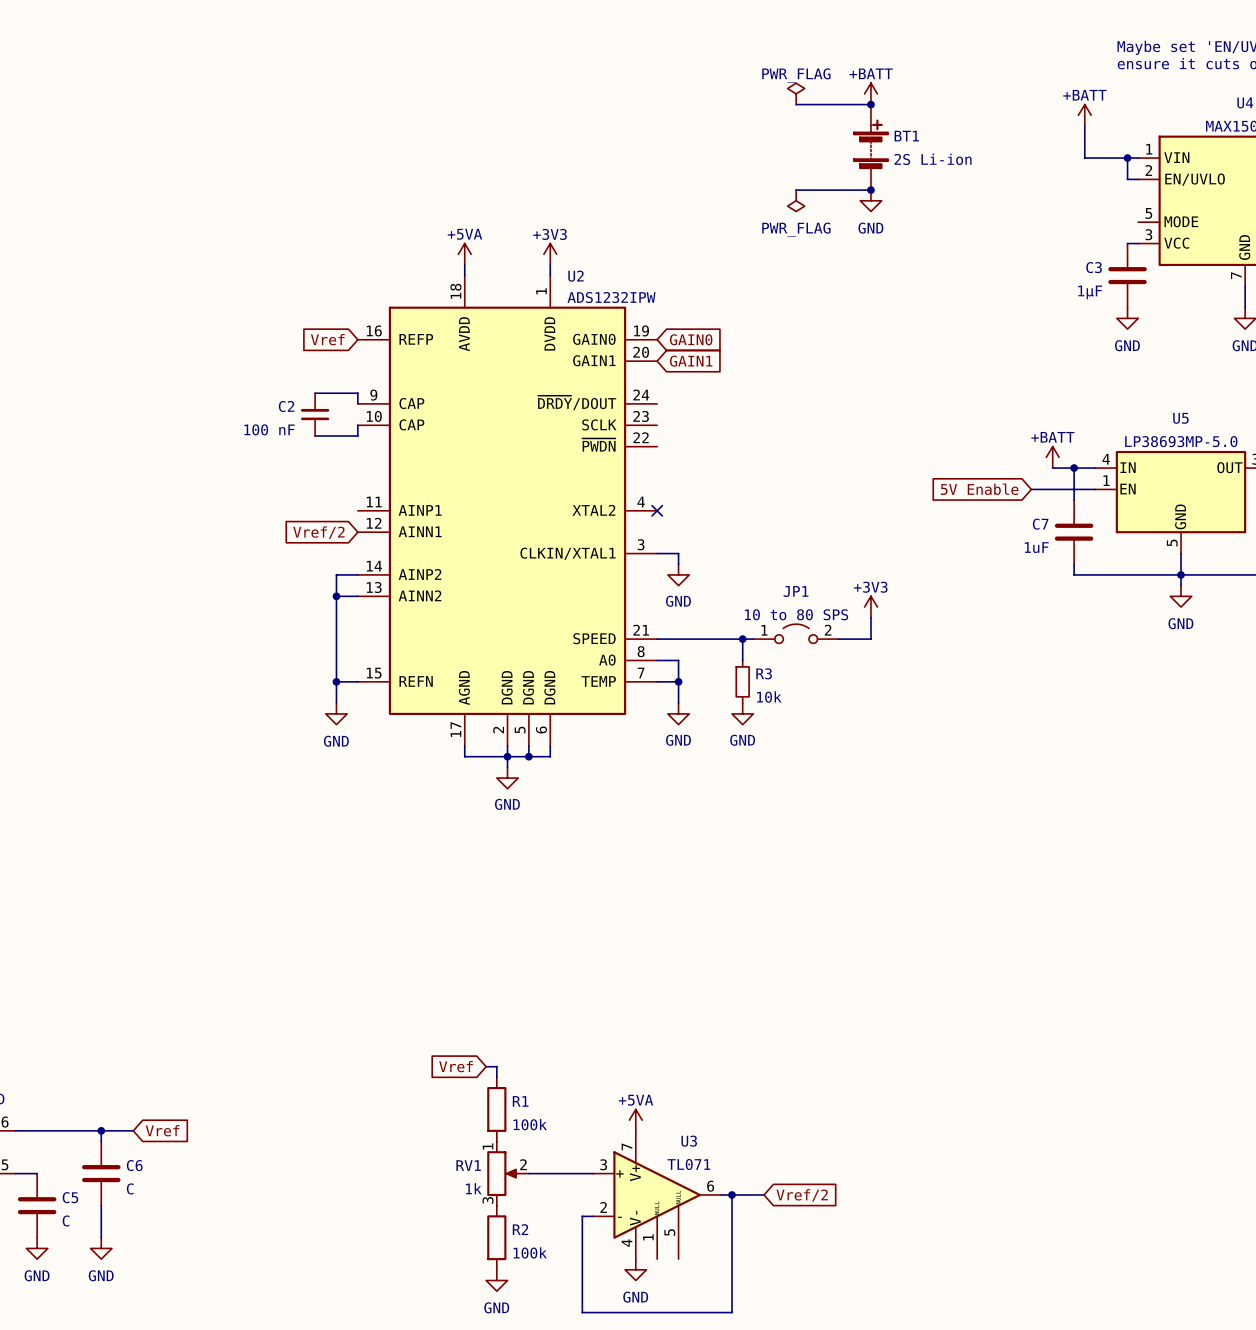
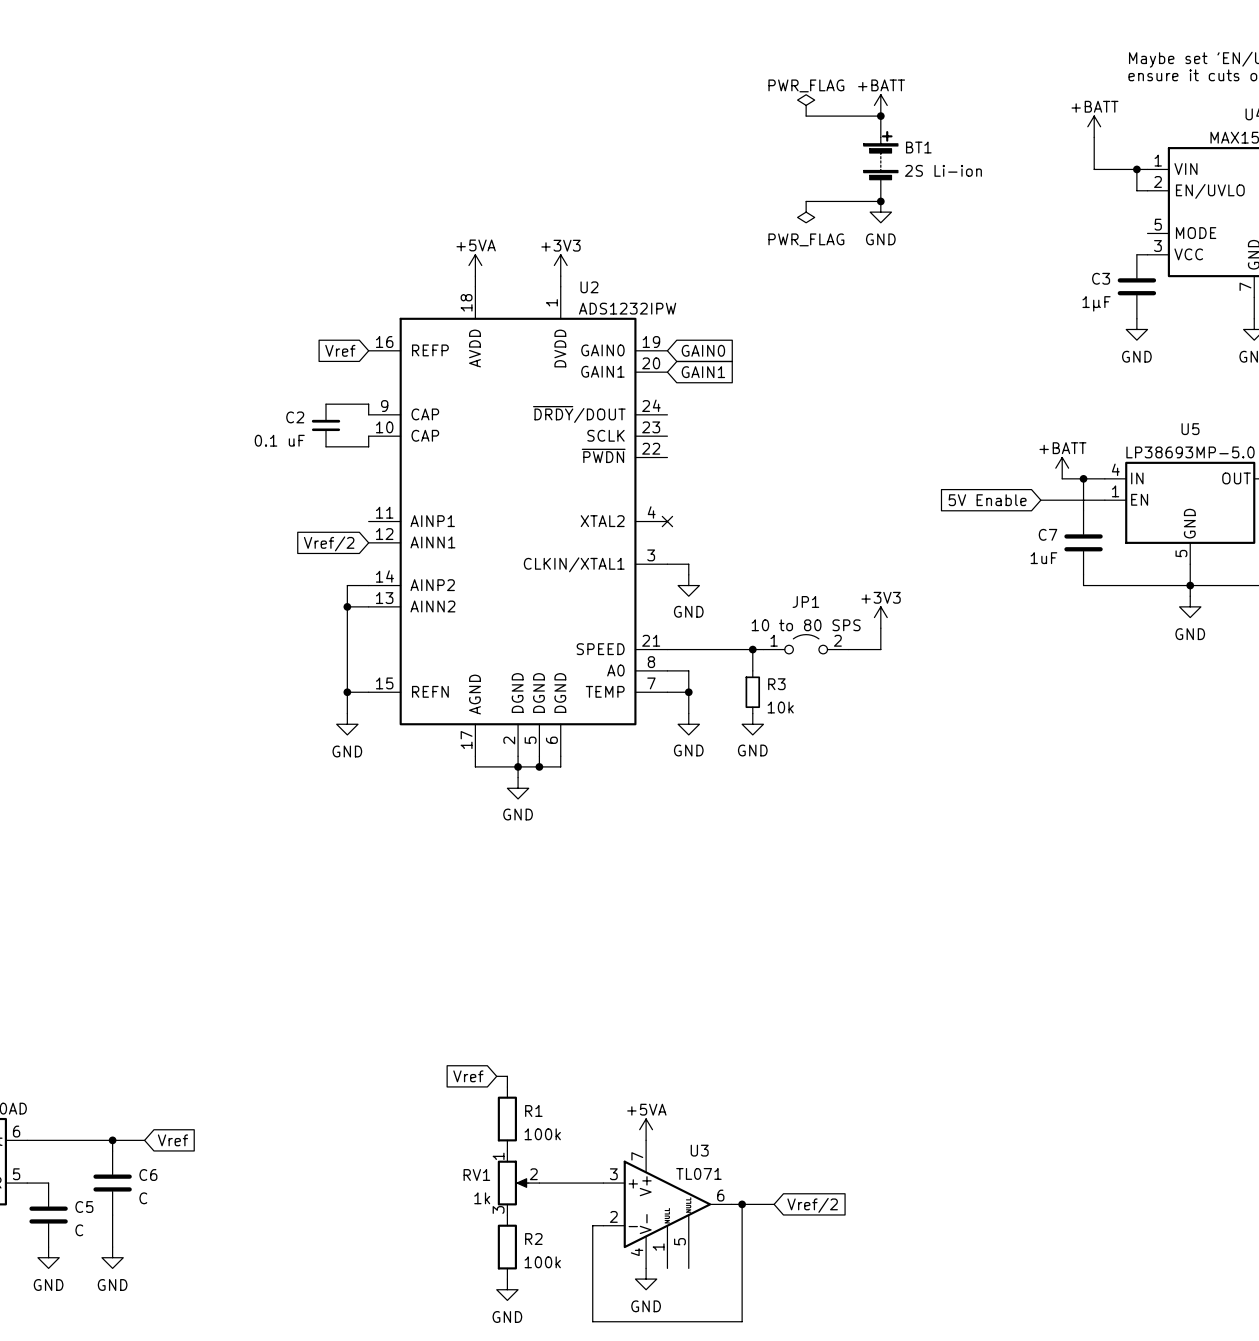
C2 value: 100 nF (269, 429) -> 0.1 uF (279, 440)

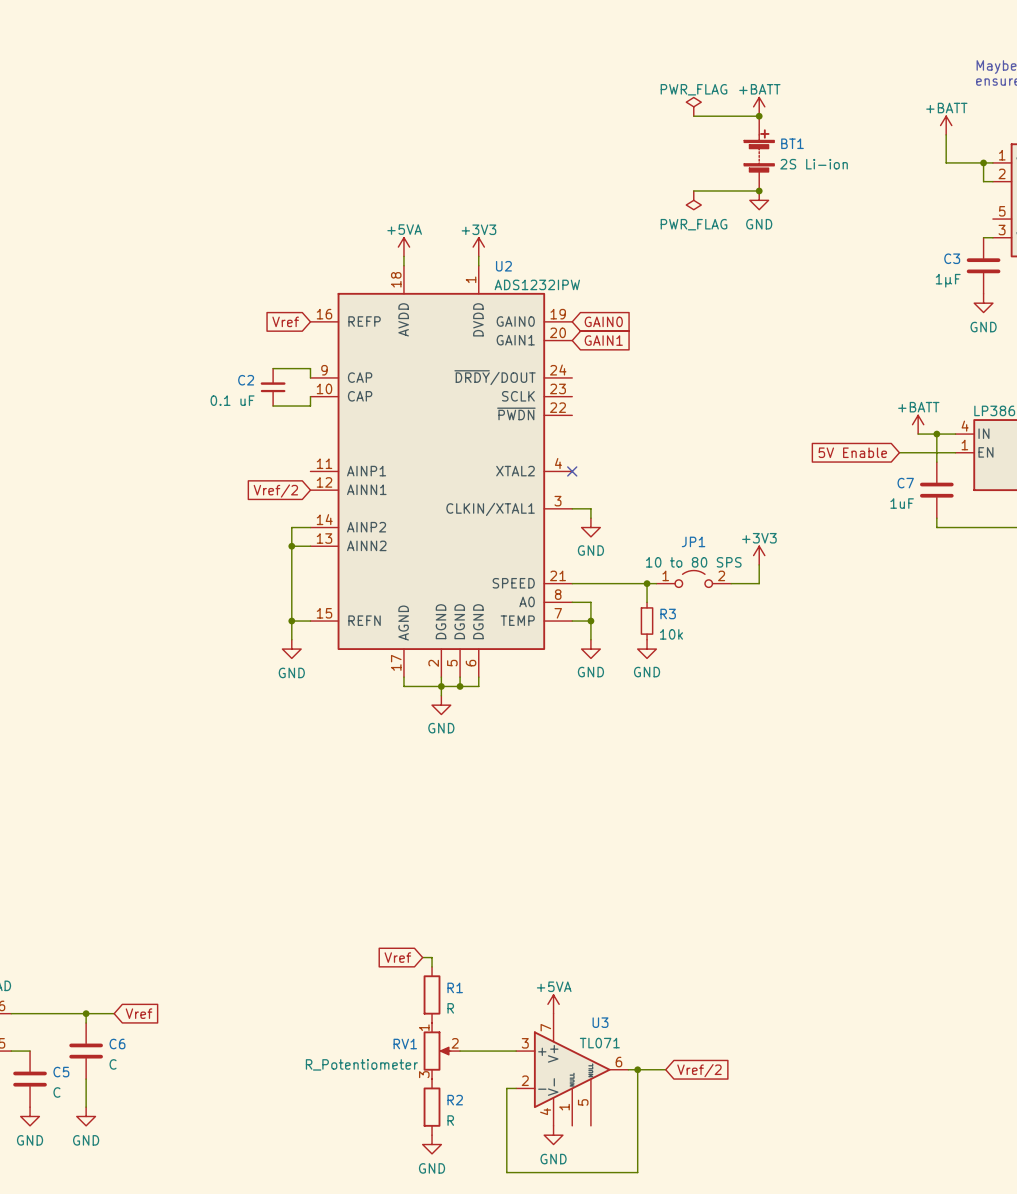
R1 value: 100k (542, 1134) -> R (450, 1008)
RV1 value: 1k (482, 1198) -> R_Potentiometer (361, 1064)
R2 value: 100k (542, 1262) -> R (450, 1120)

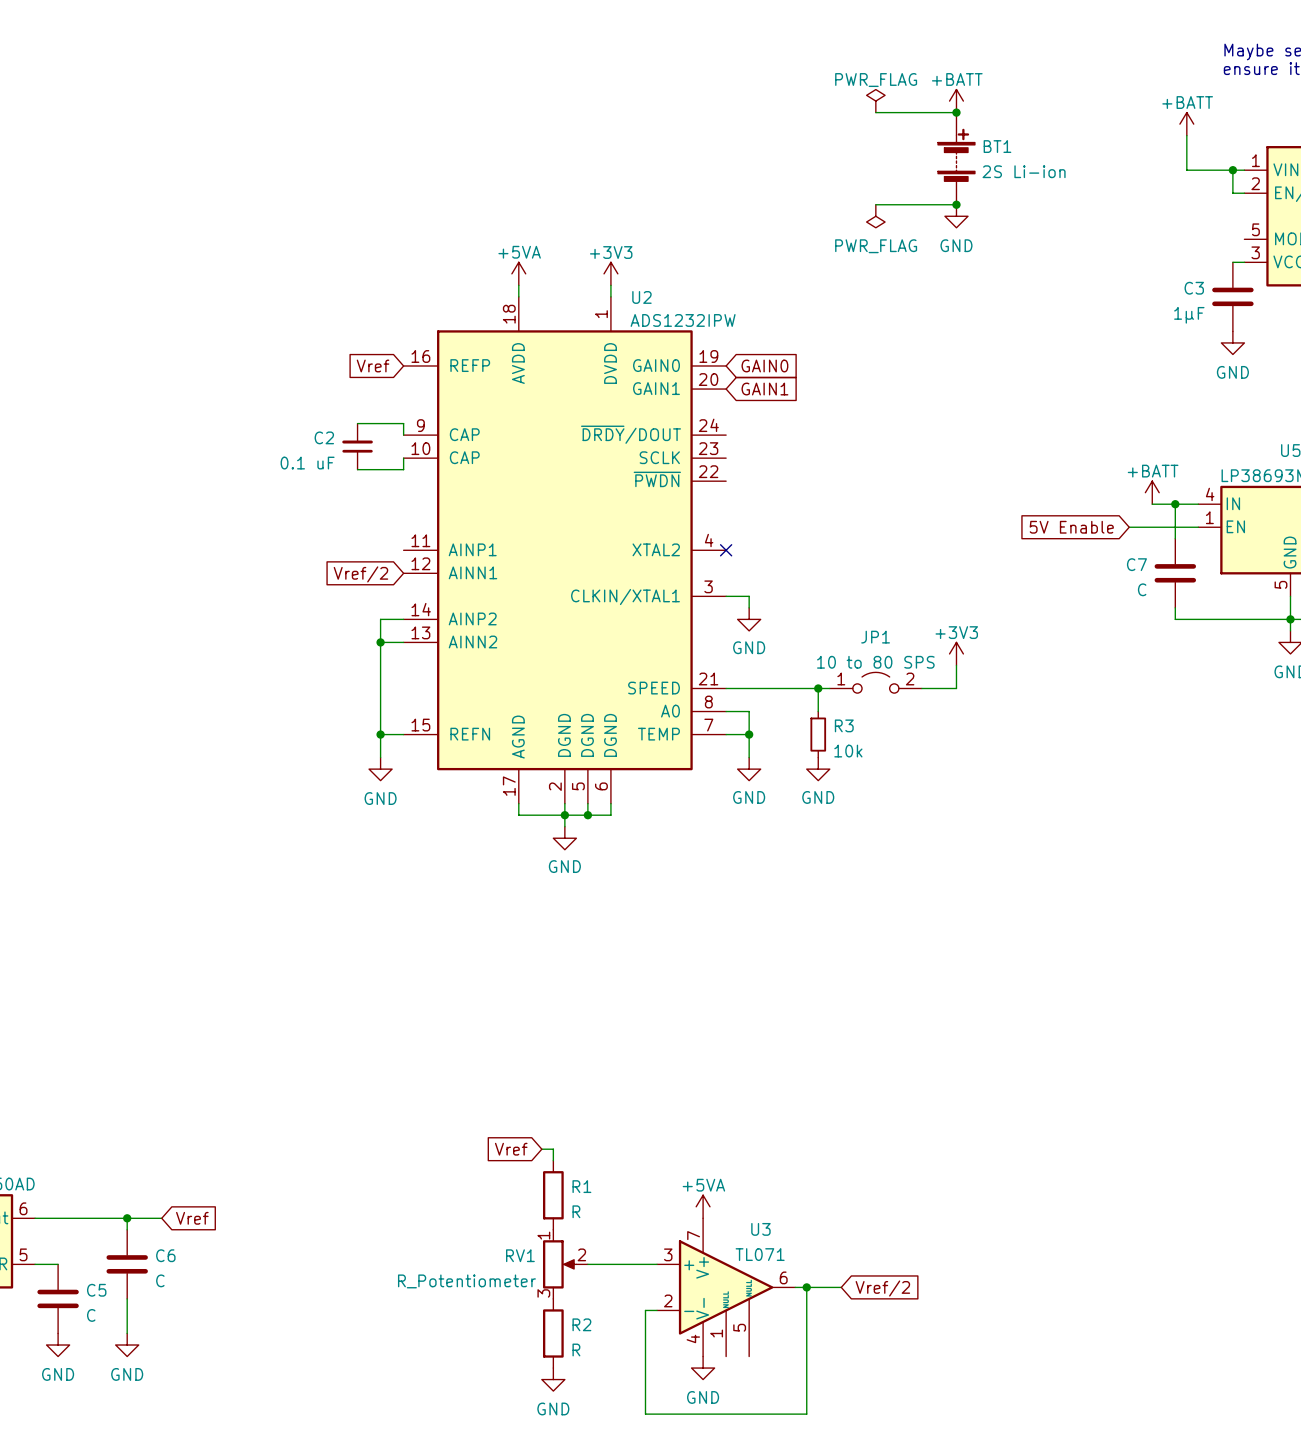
C7 value: 1uF (902, 503) -> C (1142, 589)

